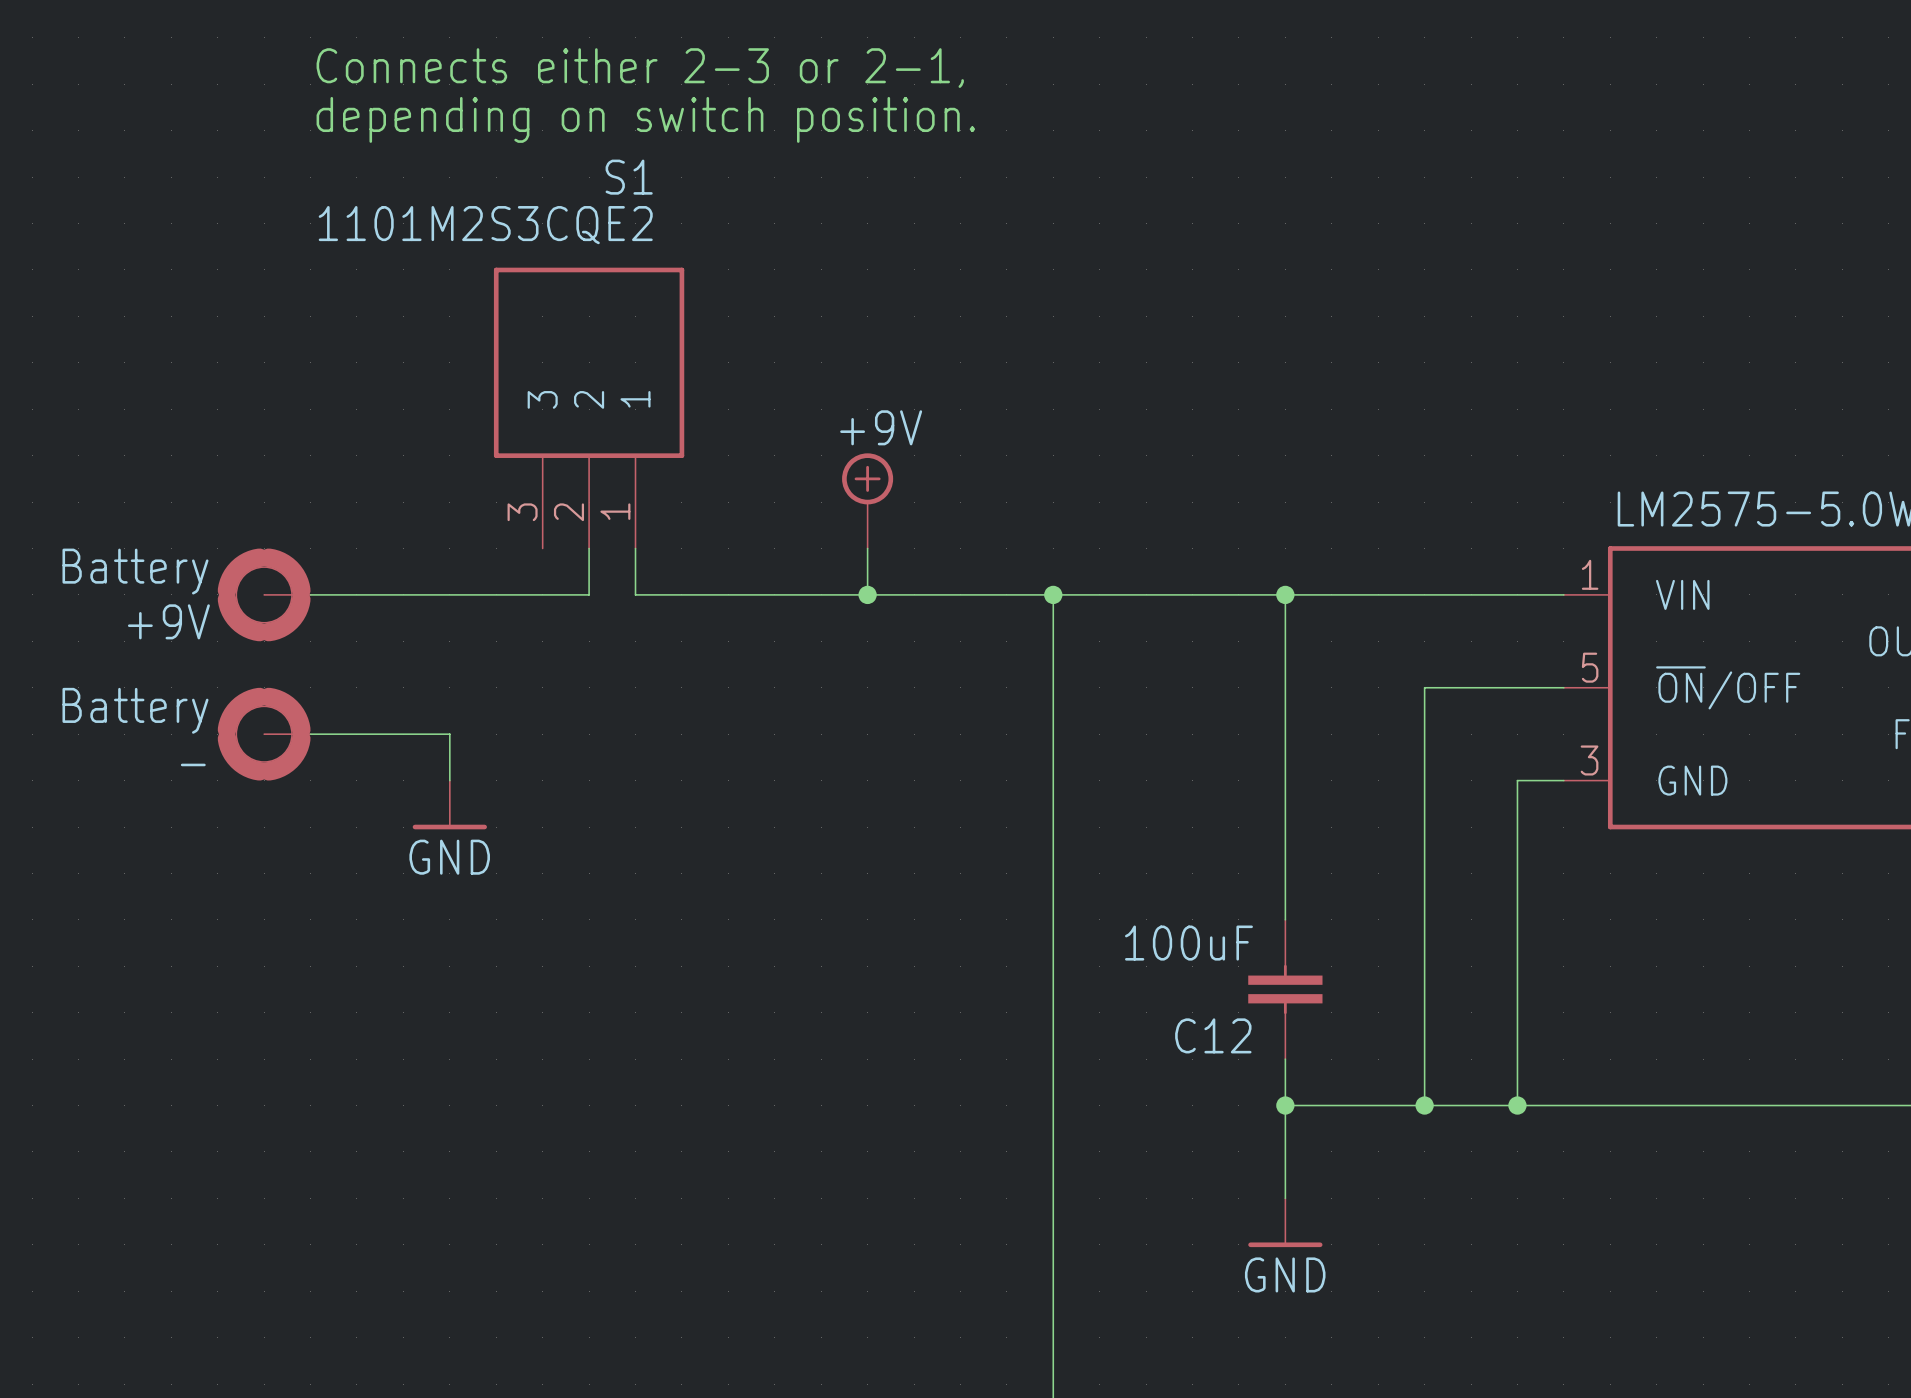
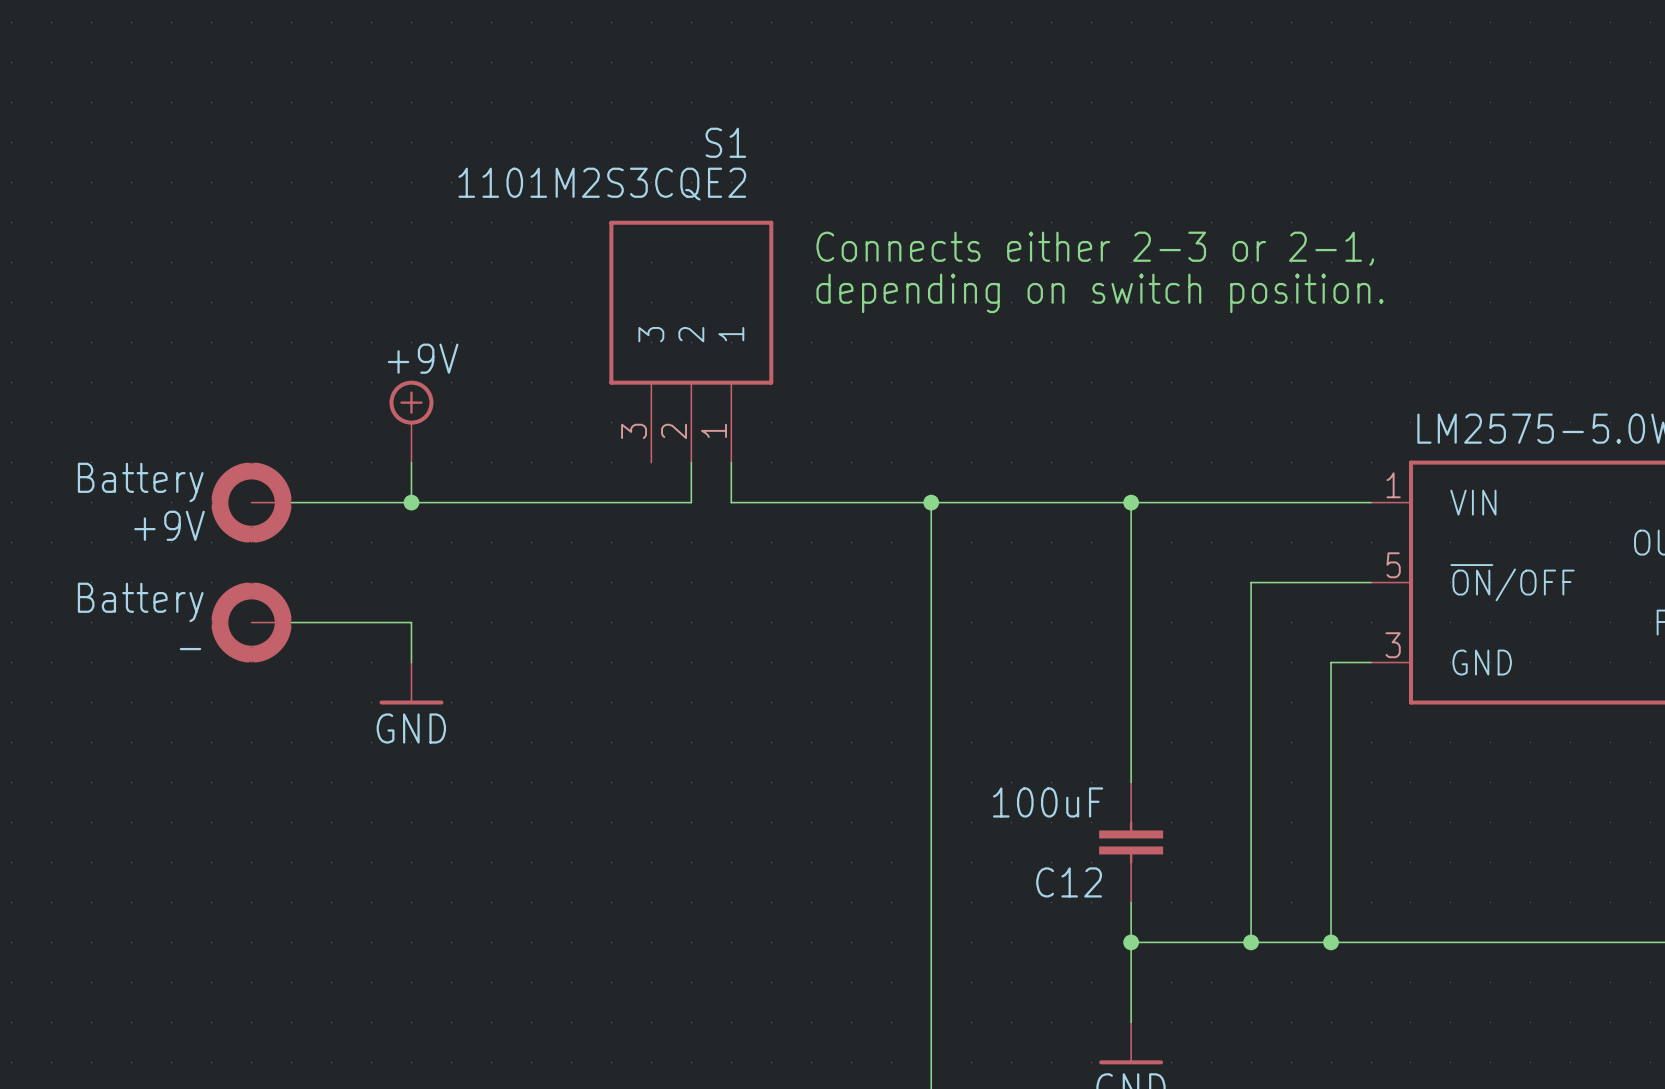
text: Connects either 2-3 or 2-1, (640, 68) -> none
text: depending on switch position. (645, 119) -> none
text: none -> Connects either 2-3 or 2-1, (1095, 248)
text: none -> depending on switch position. (1100, 293)
S1 position: (589, 408) -> (691, 341)
power symbol position: +9V (867, 500) -> +9V (411, 421)
wire: (589, 548) (589, 594) -> (571, 502) (531, 502)
wire: (635, 548) (635, 594) -> (411, 462) (411, 502)
wire: (867, 548) (867, 594) -> (731, 462) (731, 502)
junction: none -> (411, 502)
wire: (774, 594) (821, 594) -> (691, 502) (691, 462)
junction: (867, 594) -> none

